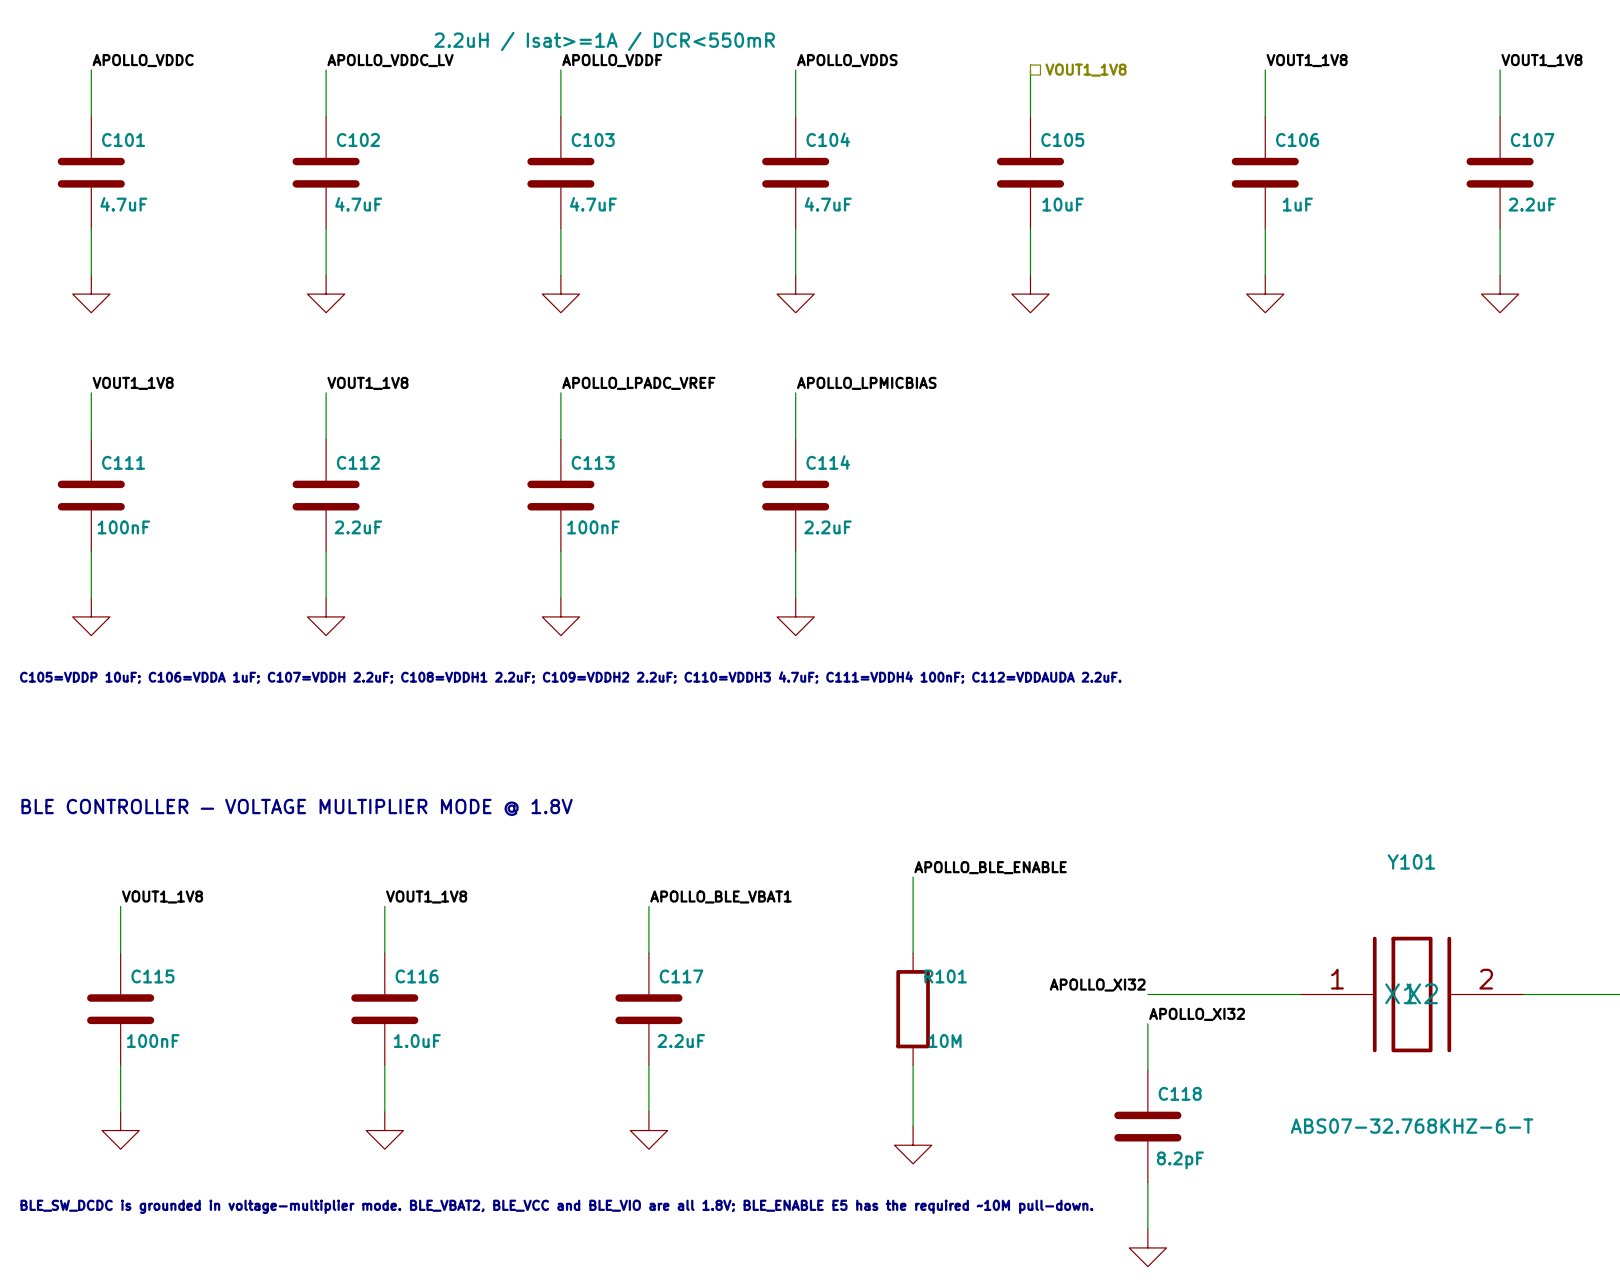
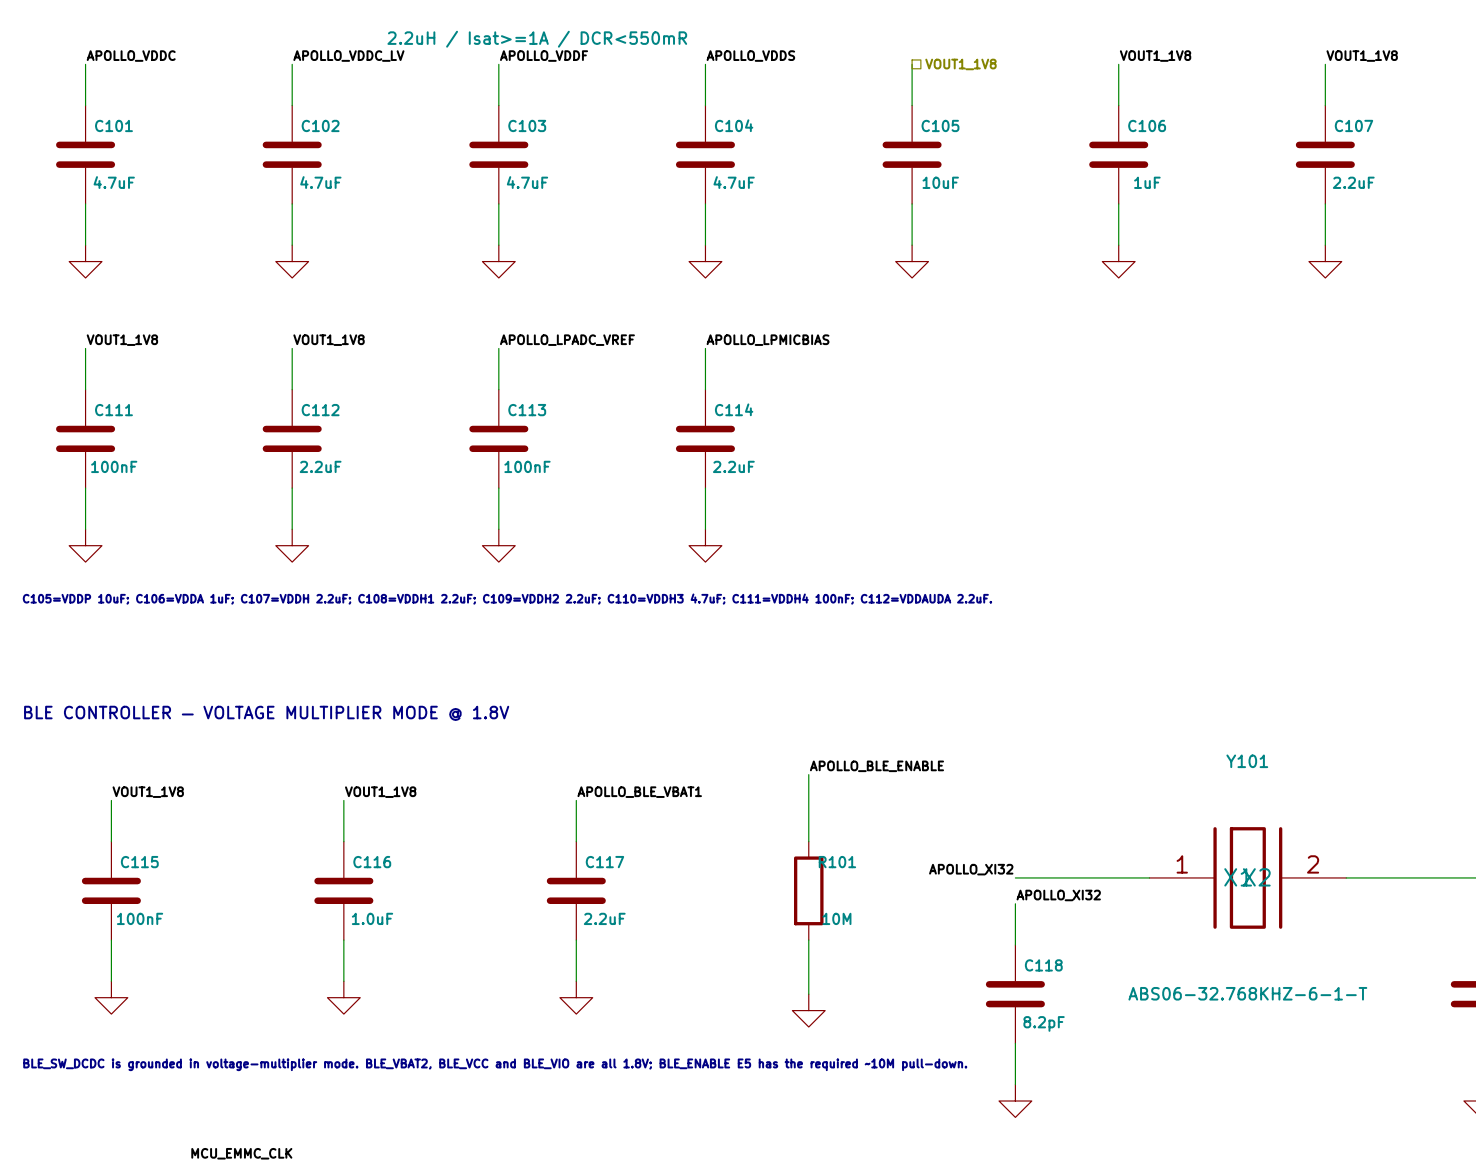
Y101 value: ABS07-32.768KHZ-6-T (1412, 1126) -> ABS06-32.768KHZ-6-1-T (1247, 993)

